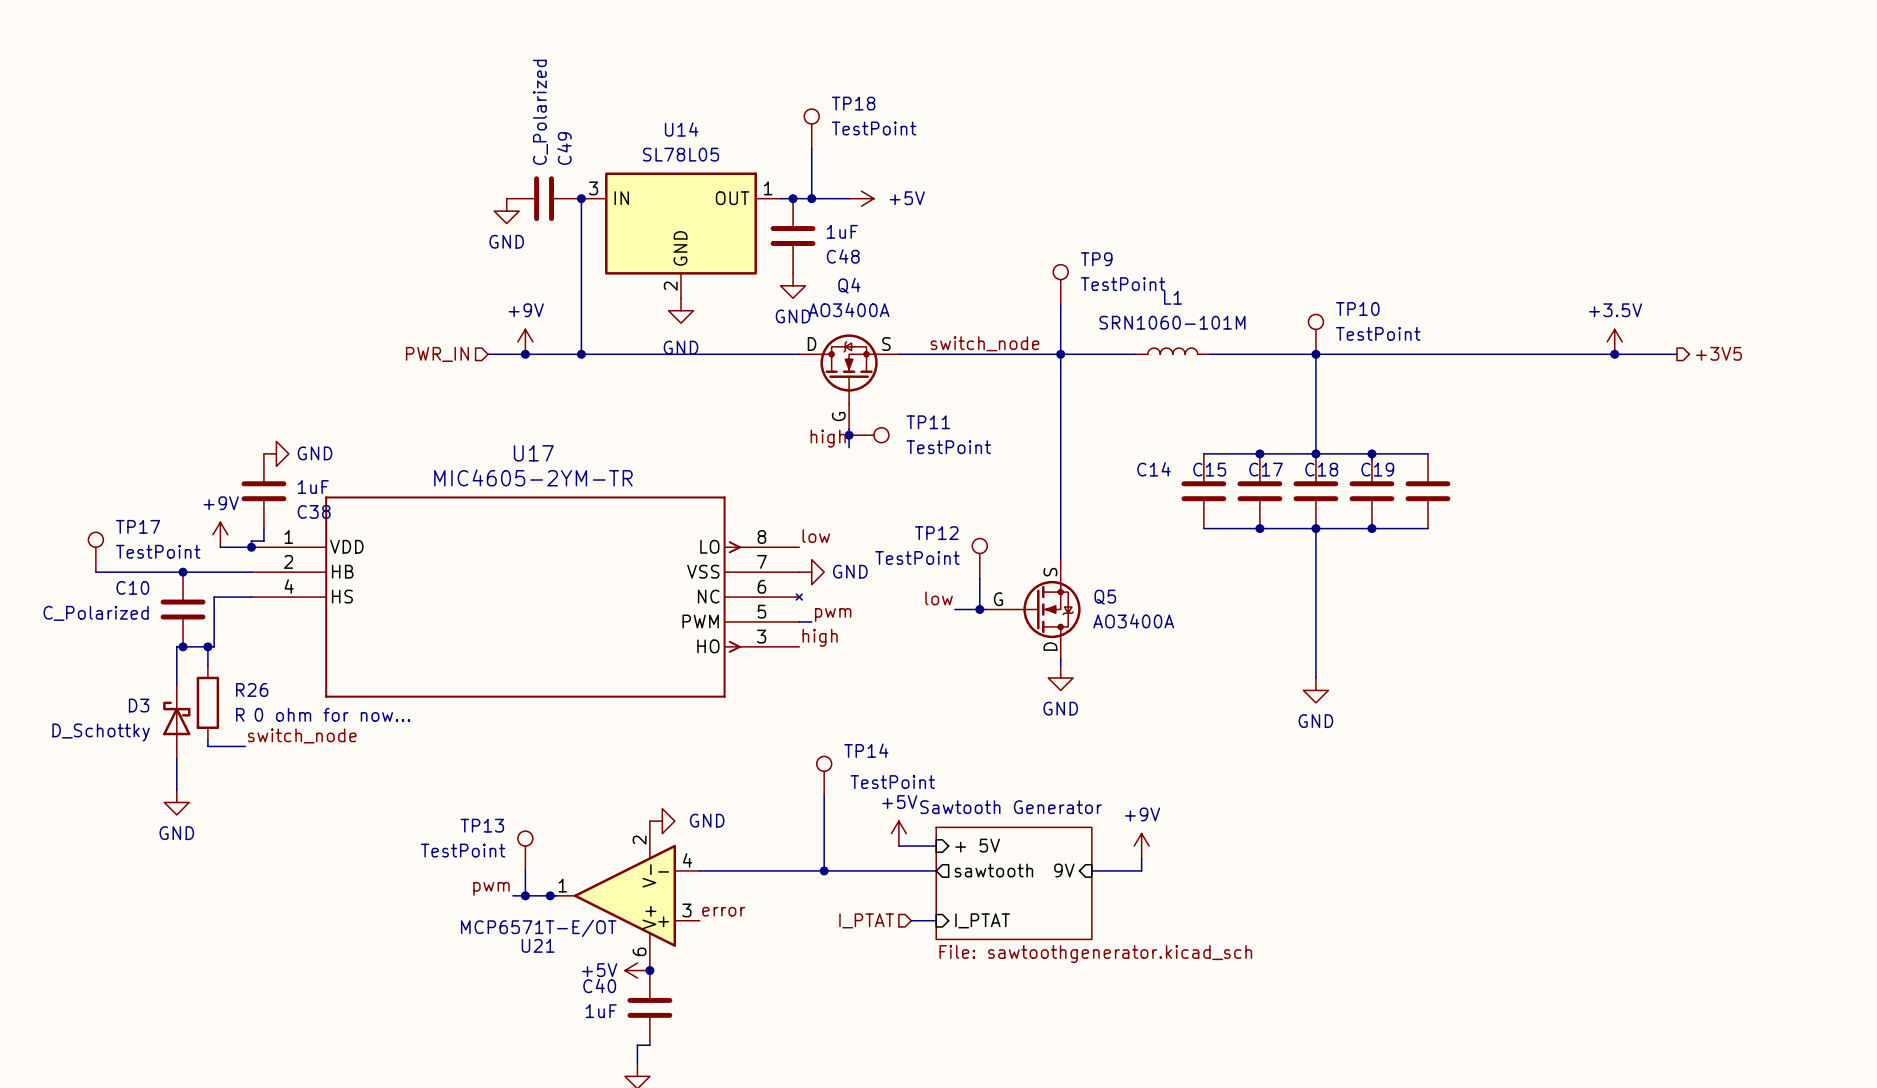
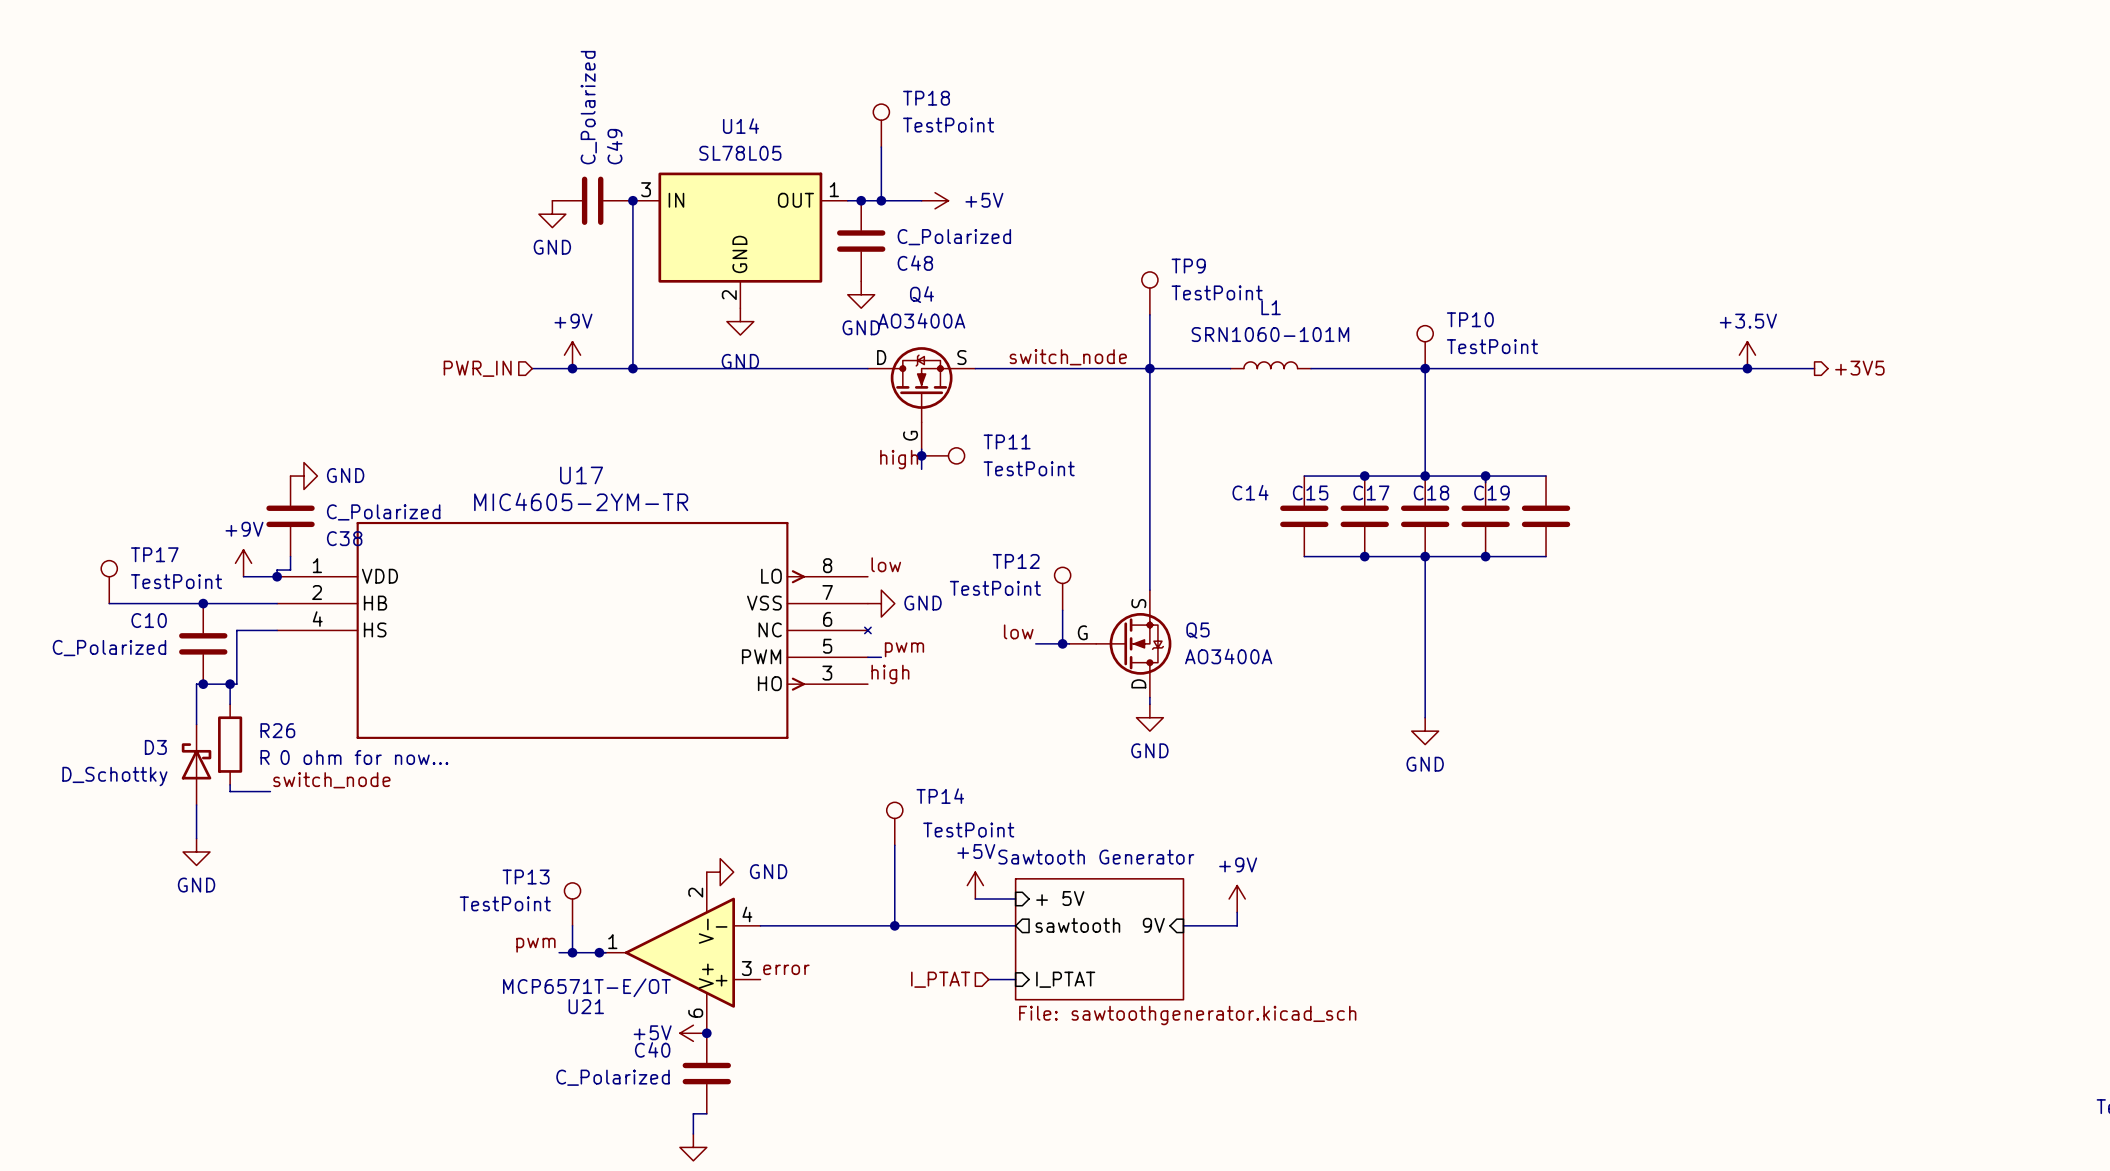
C48 value: 1uF (842, 231) -> C_Polarized (954, 237)
C38 value: 1uF (313, 487) -> C_Polarized (383, 512)
C40 value: 1uF (601, 1011) -> C_Polarized (613, 1077)

